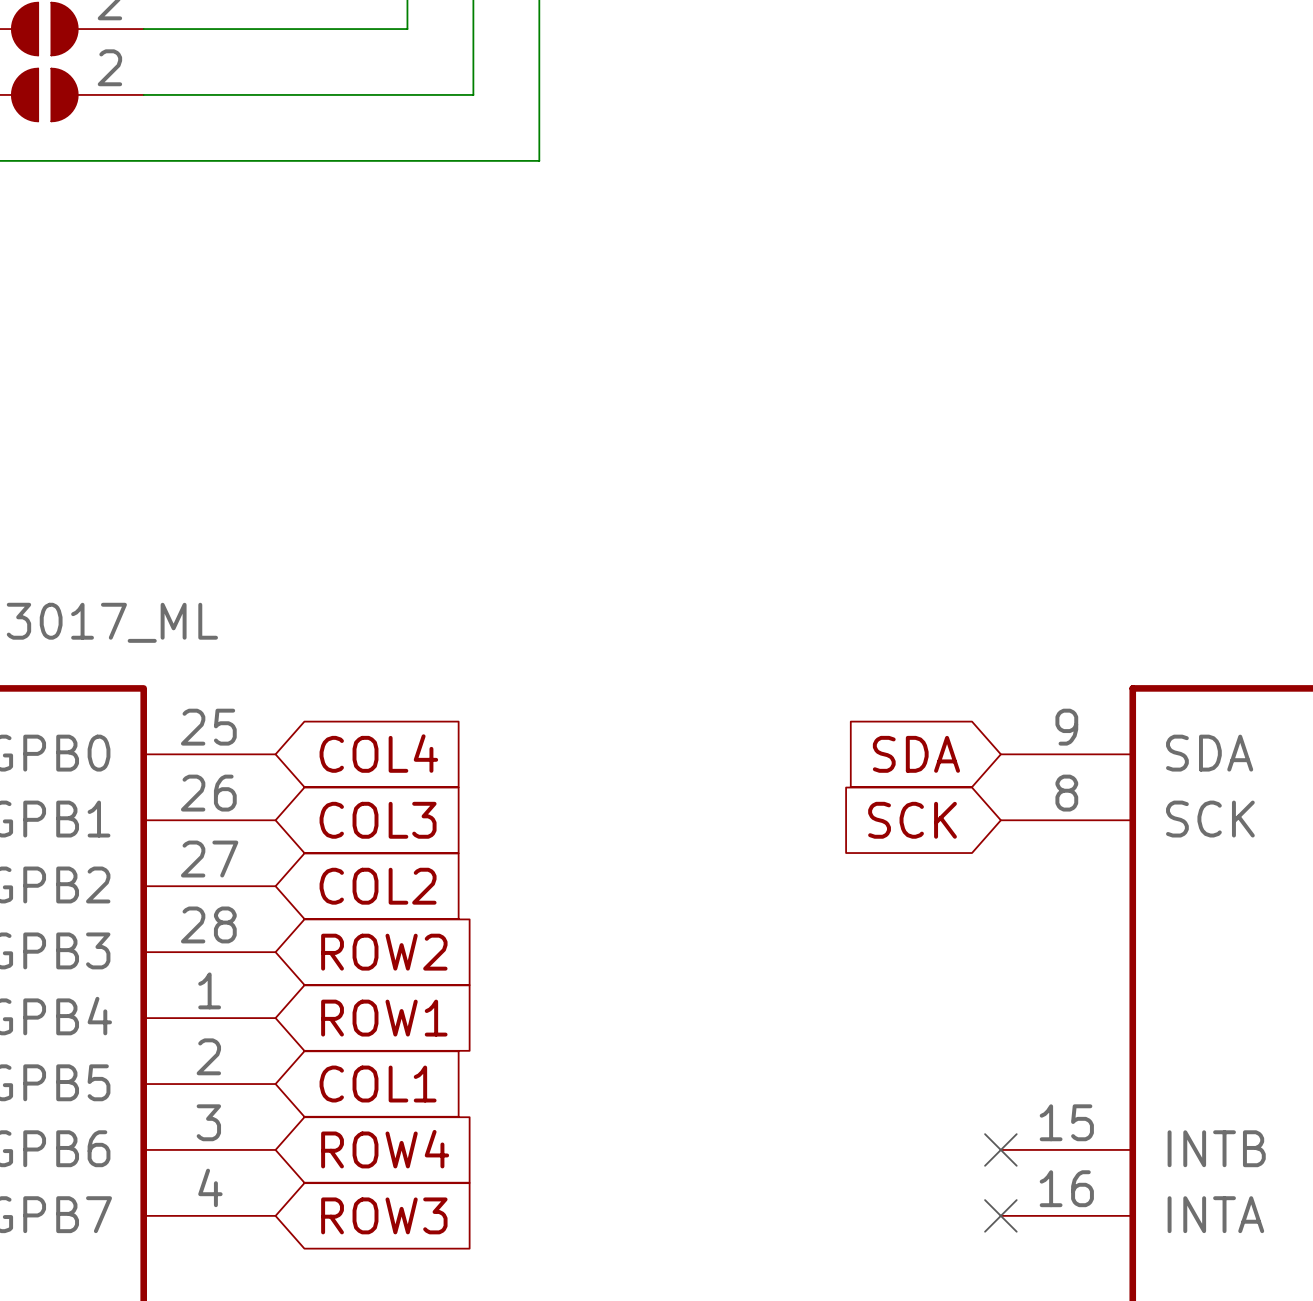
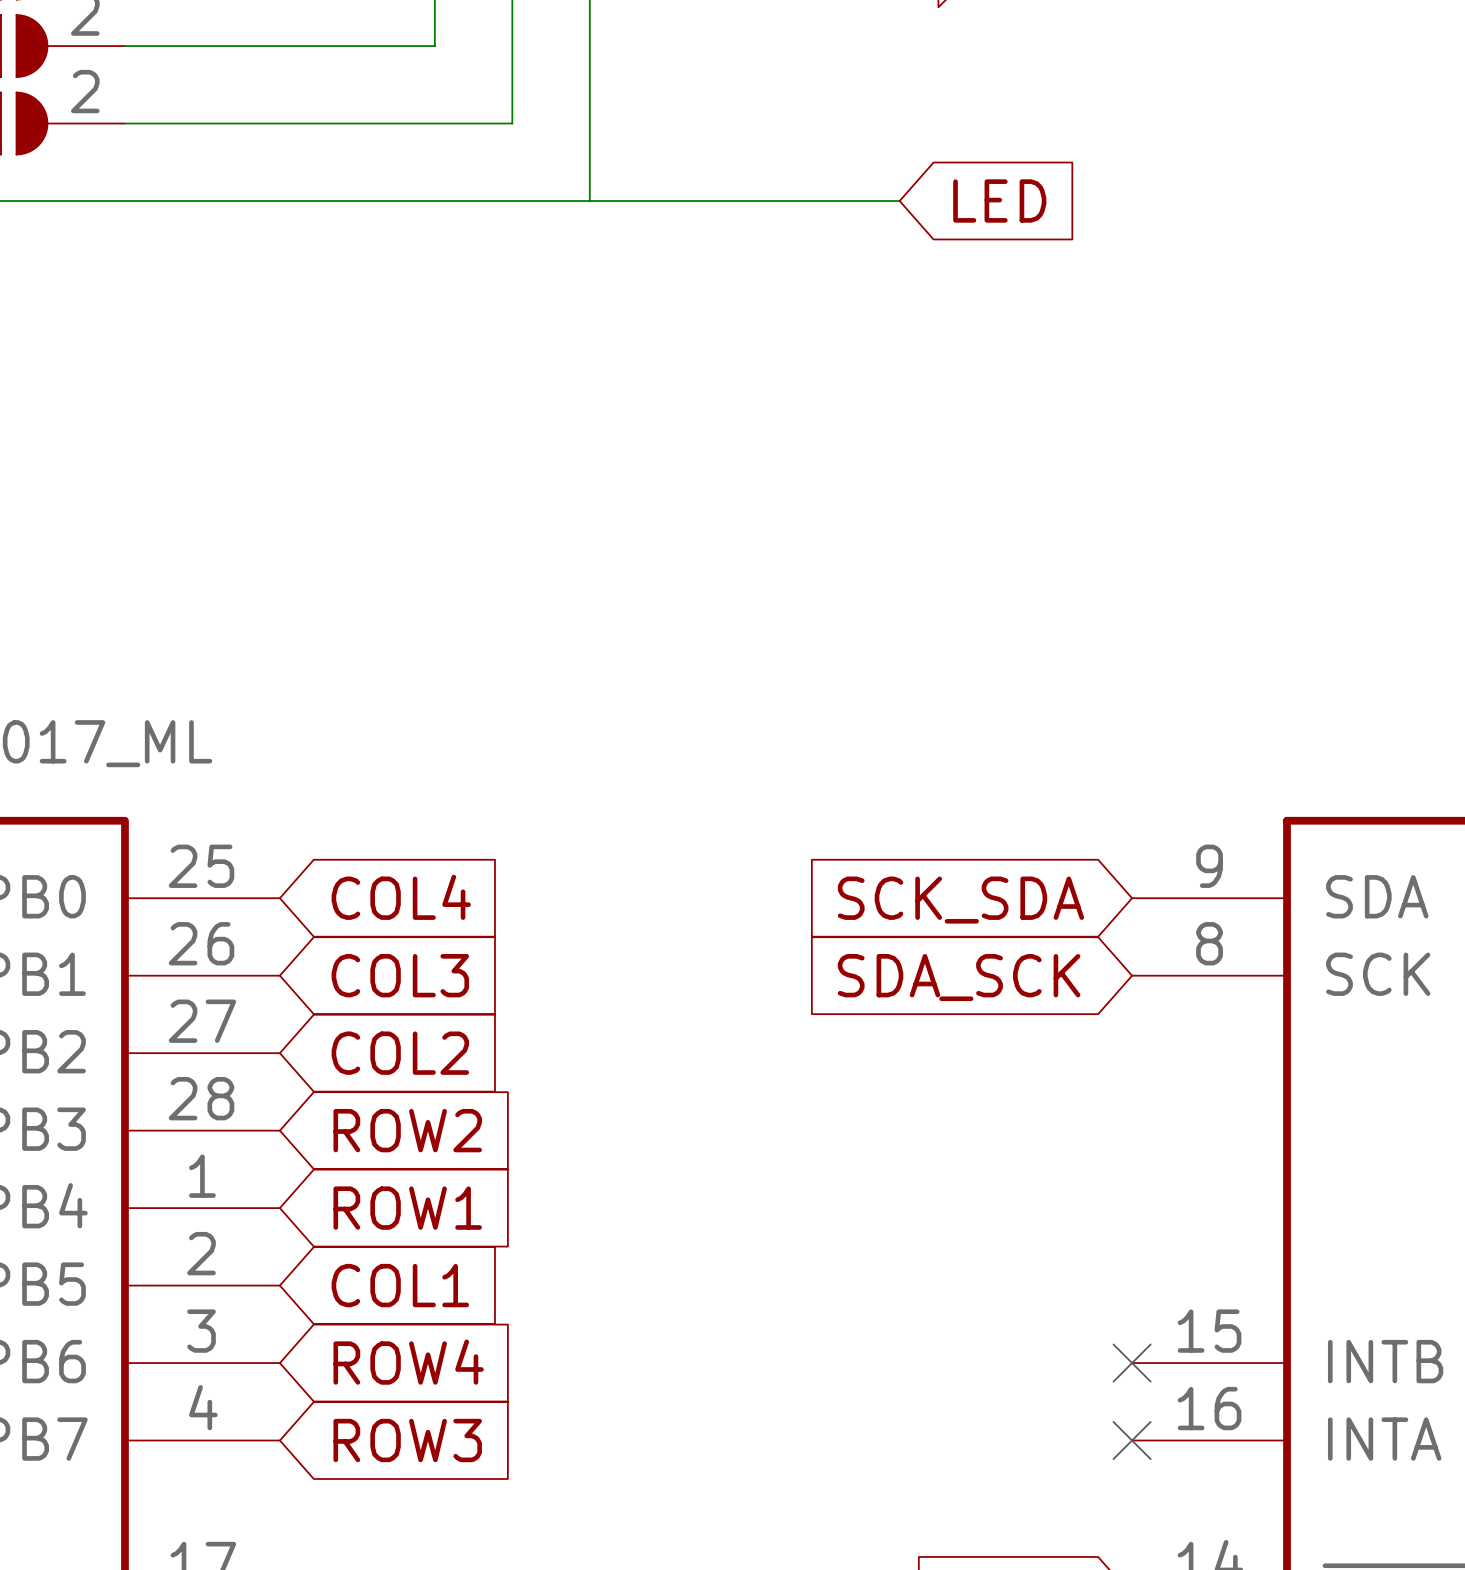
wire: none -> (589, 200) (899, 200)
global label: none -> LED (999, 200)
global label: SDA (916, 754) -> SCK_SDA (960, 900)
global label: SCK (912, 820) -> SDA_SCK (959, 977)

